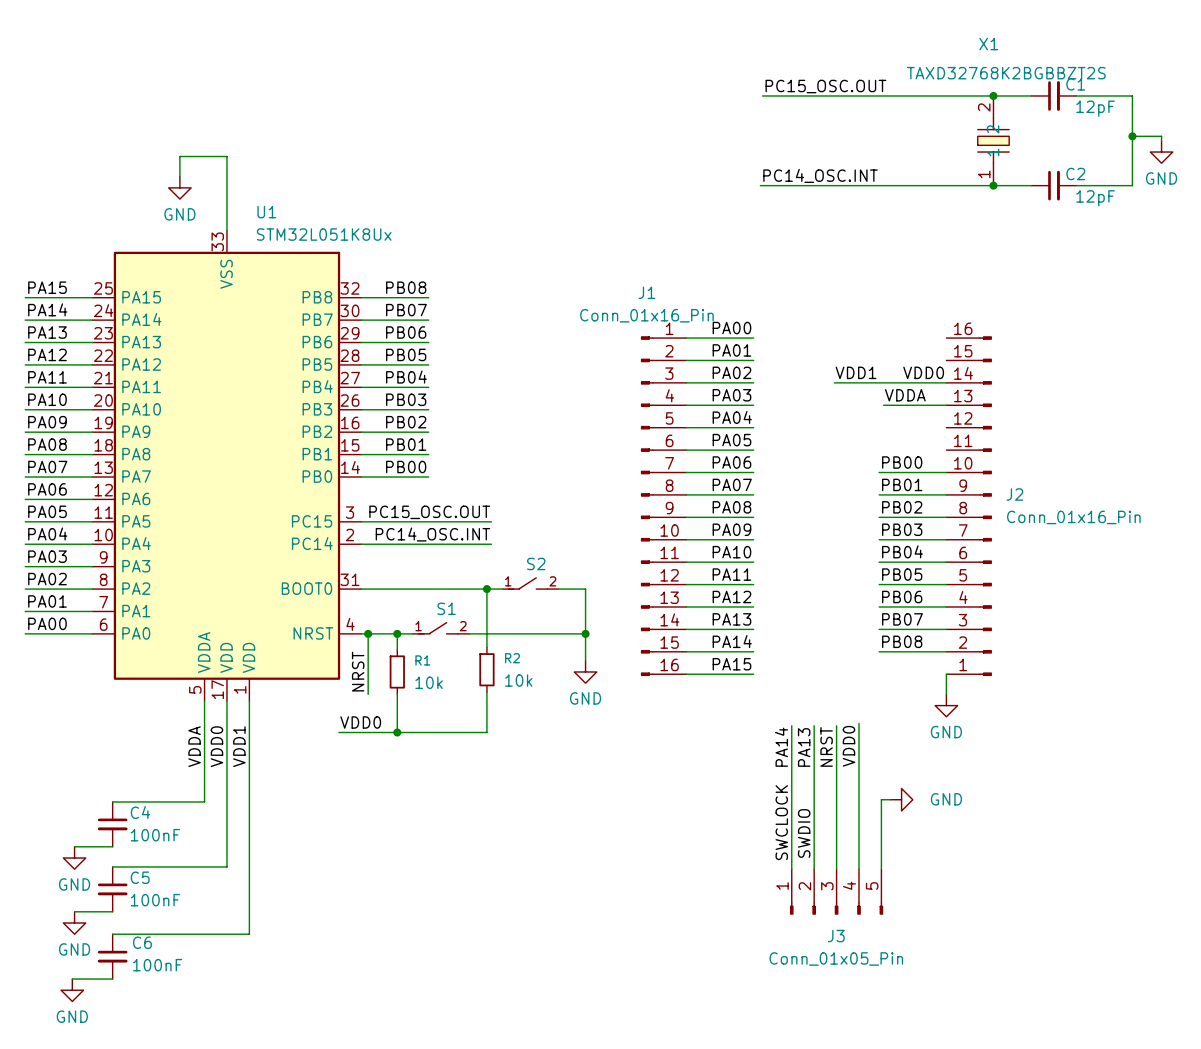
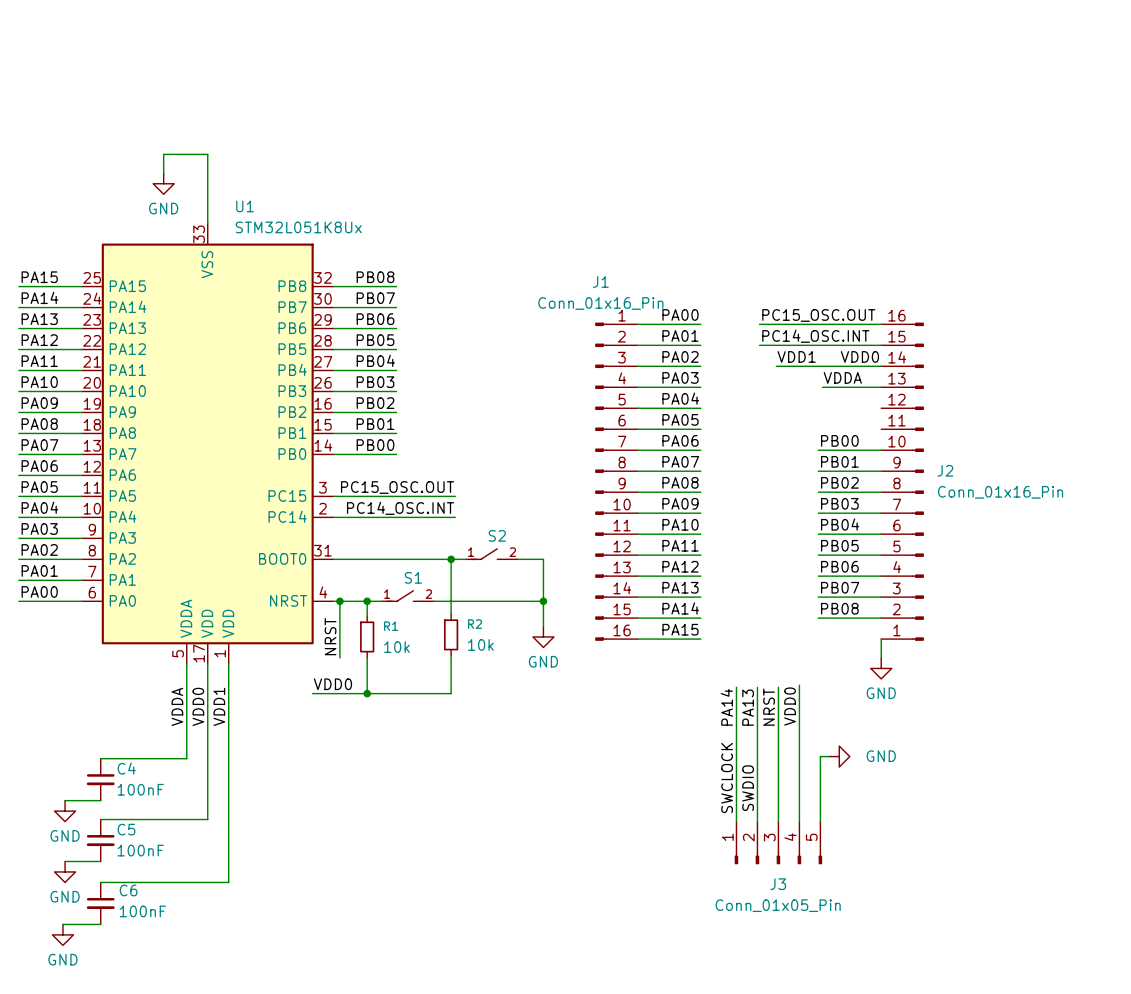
label: PC15_OSC.OUT (825, 86) -> none
wire: (762, 95) (1031, 95) -> none
junction: (993, 95) -> none
C1: 12pF (1053, 95) -> none
wire: (1076, 95) (1132, 95) (1132, 185) (1076, 185) -> none
wire: (1132, 136) (1161, 136) (1161, 140) -> none
junction: (1132, 136) -> none
X1: TAXD32768K2BGBBZT2S (993, 140) -> none
power symbol: GND (1161, 152) -> none
label position: PC14_OSC.INT (820, 175) -> PC14_OSC.INT (815, 336)
wire: (760, 185) (1031, 185) -> none
junction: (993, 185) -> none
C2: 12pF (1053, 185) -> none
label: none -> PC15_OSC.OUT (818, 315)
wire: none -> (759, 324) (881, 324)
wire: none -> (759, 345) (881, 345)

